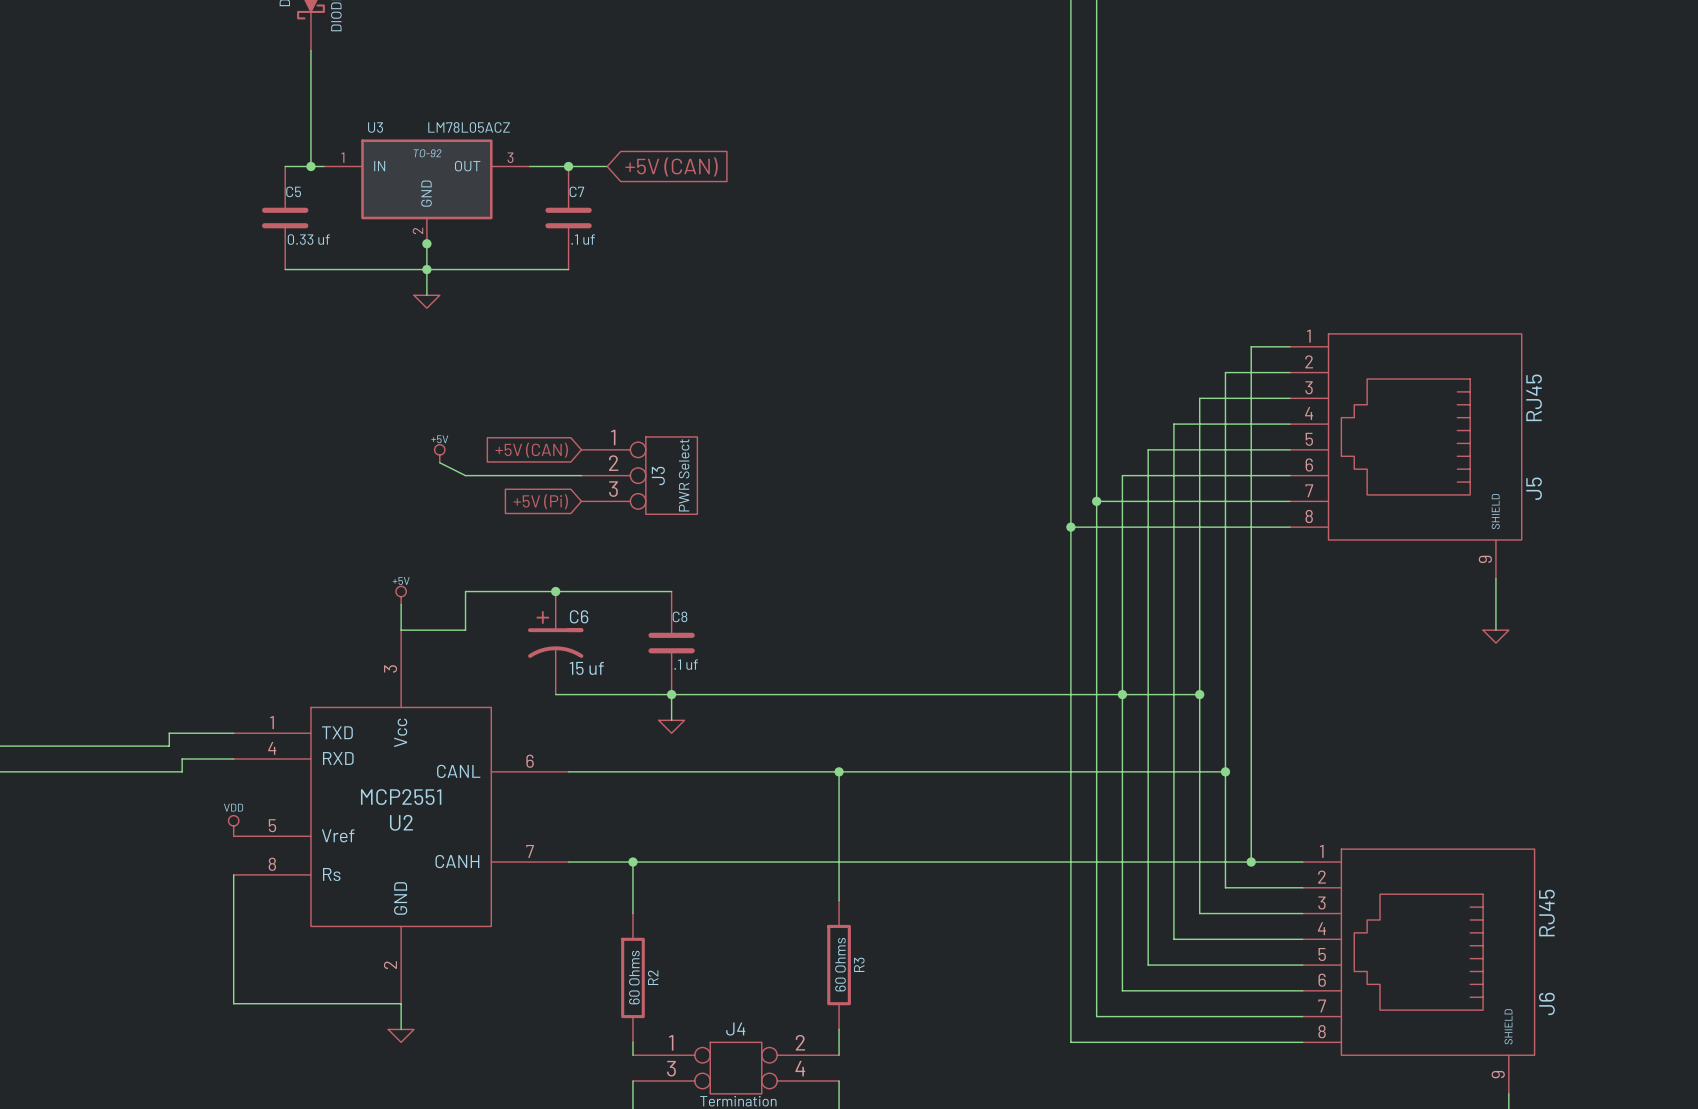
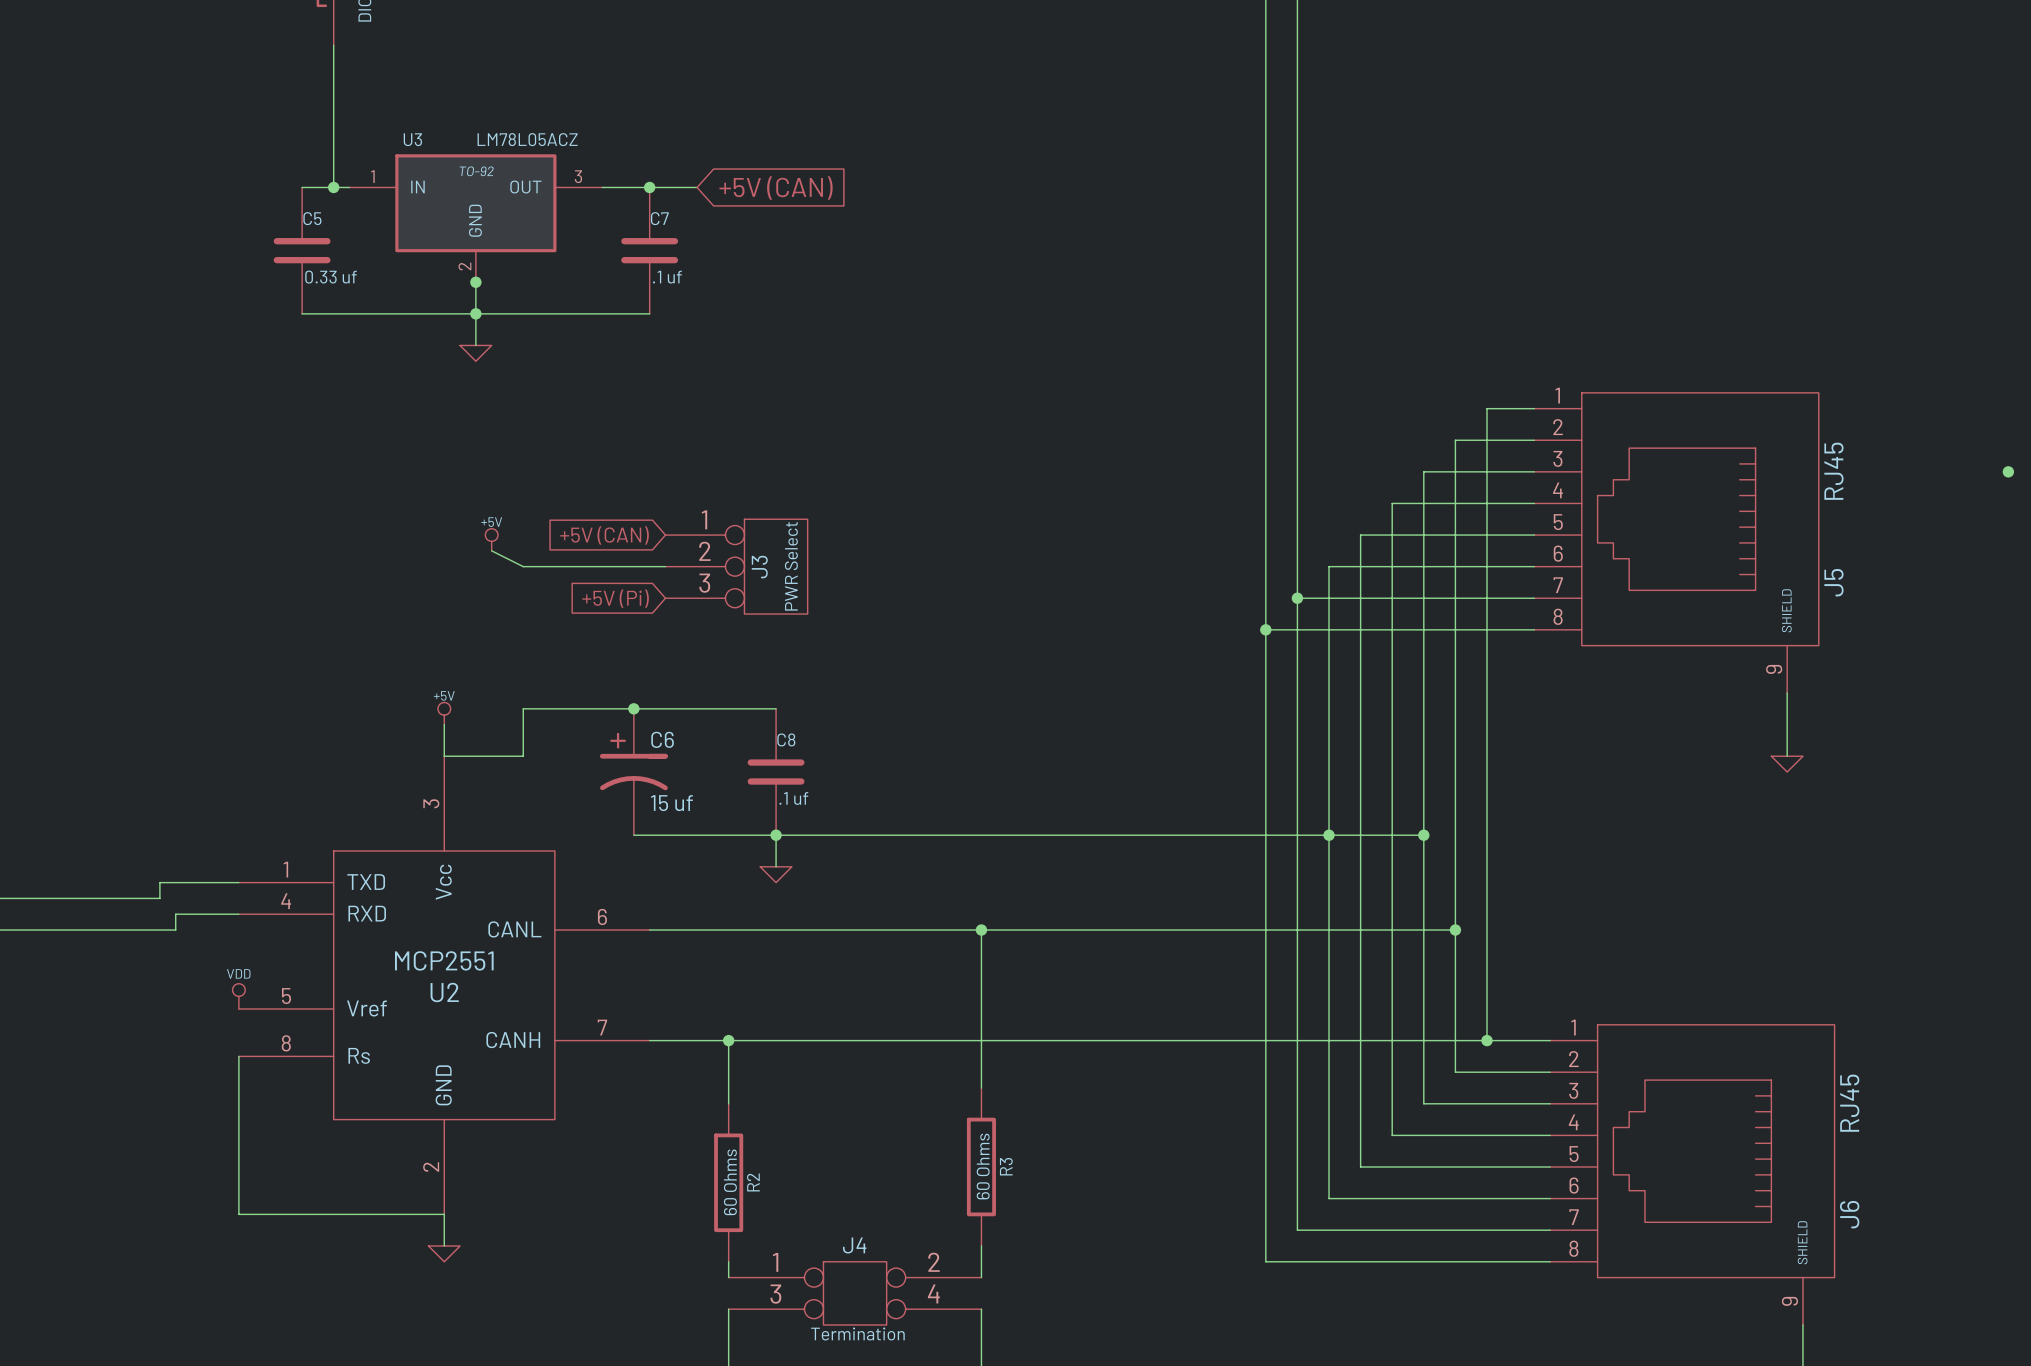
junction: none -> (2008, 471)

